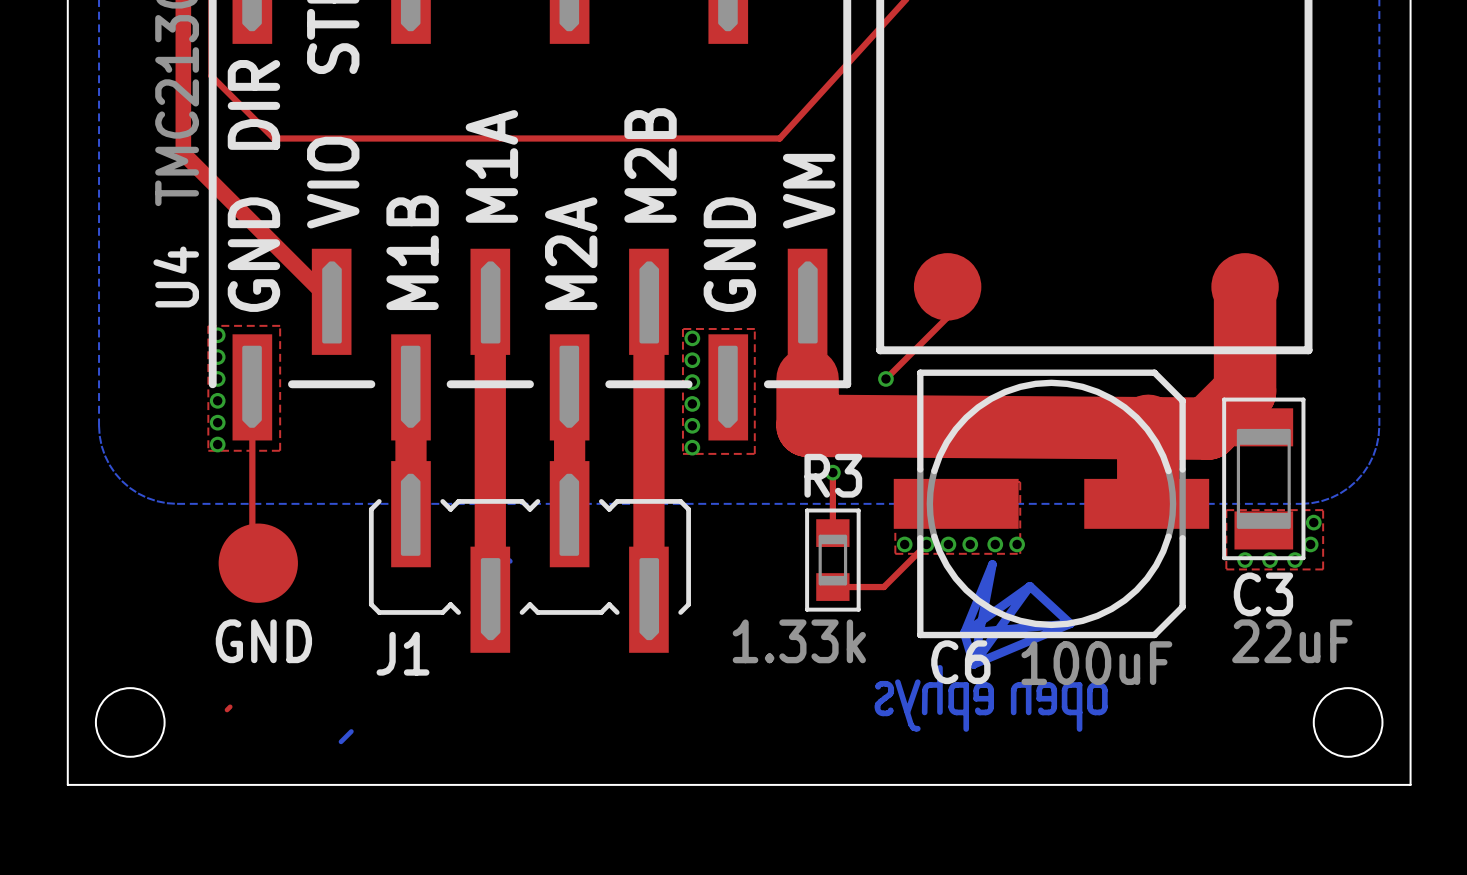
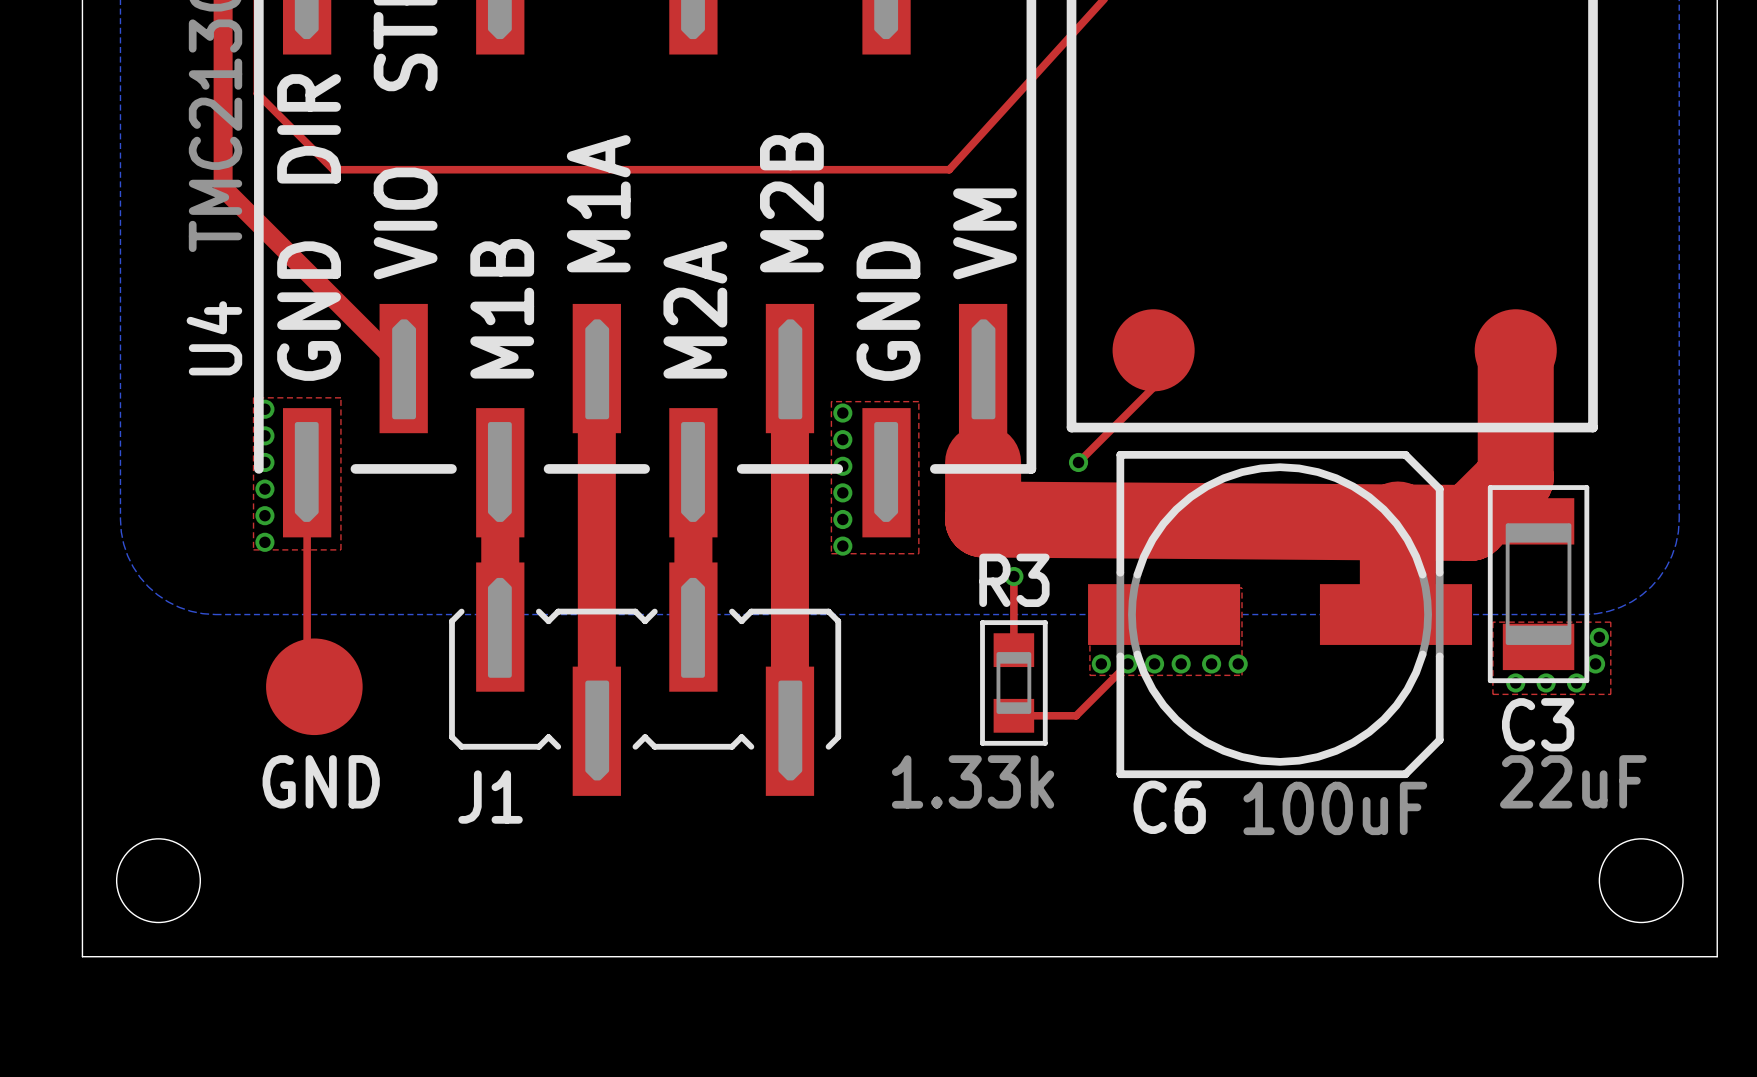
bottom track: (509, 560) (510, 561) -> none
drawing: [874, 560, 1108, 732] -> none
top track: (230, 706) (227, 709) -> none
bottom track: (351, 731) (341, 741) -> none

